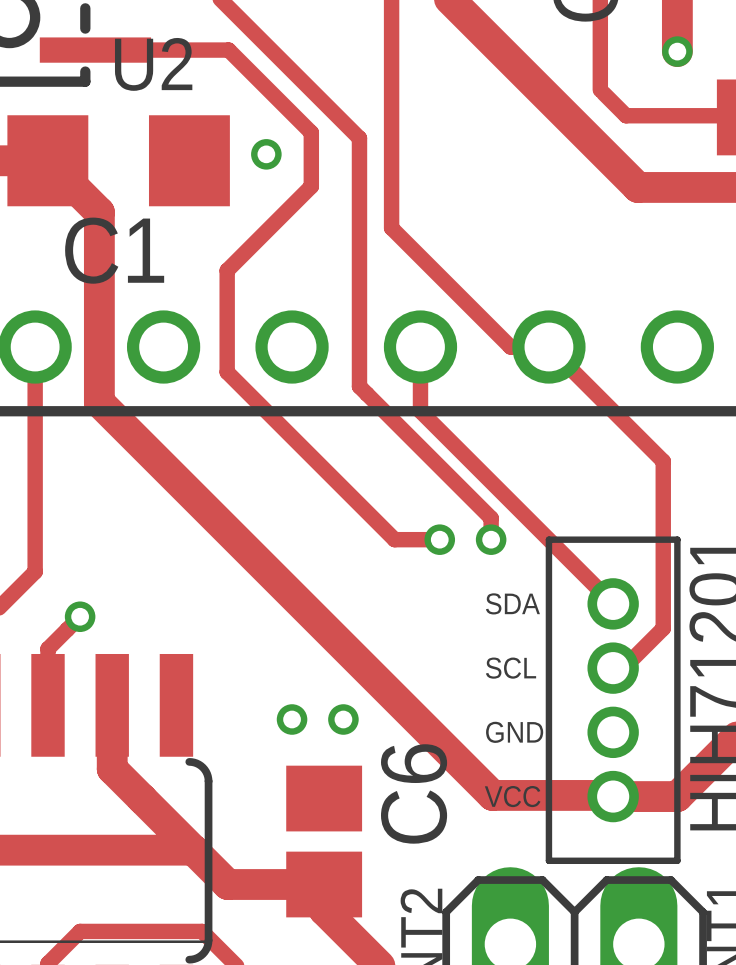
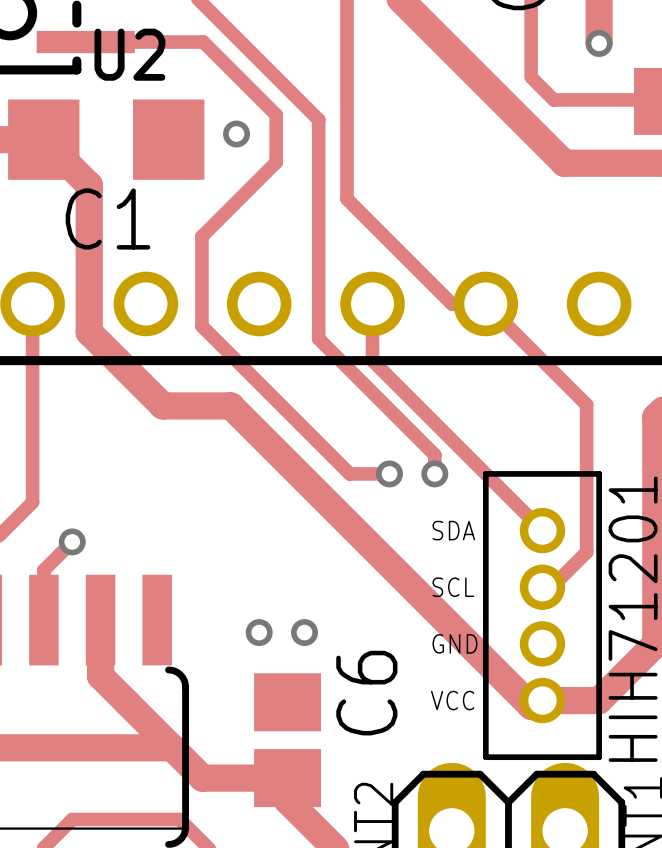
track: (99, 379) (99, 402) (492, 795) (613, 796) -> (89, 332) (162, 405) (230, 405) (531, 706) (536, 706) (542, 700)

